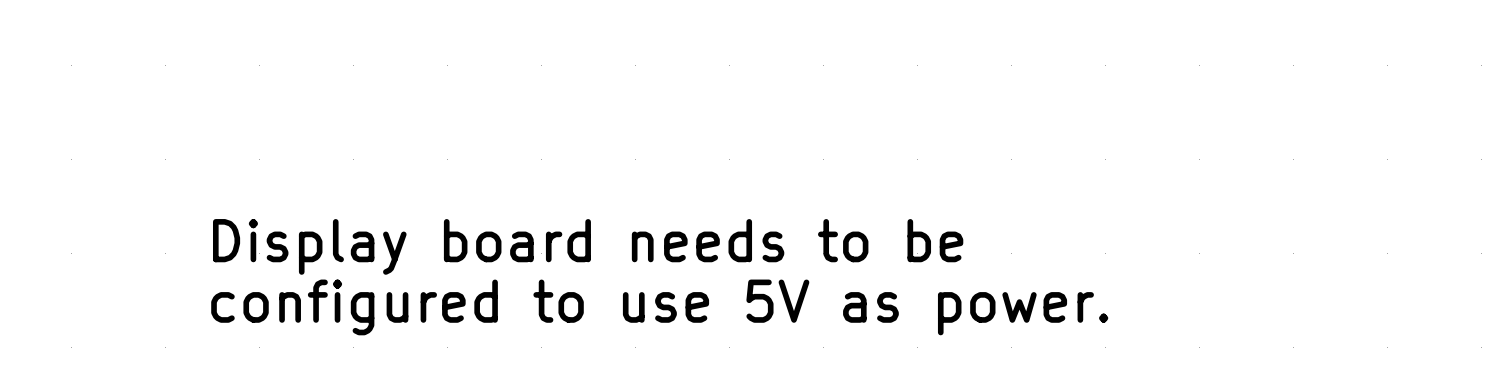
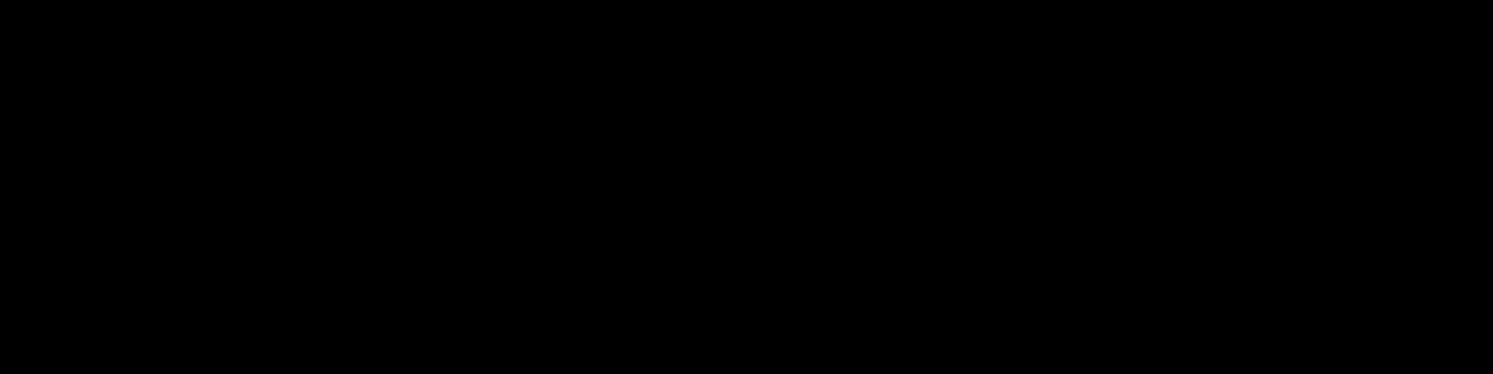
text: Display board needs to be (588, 246) -> none
text: configured to use 5V as power. (659, 307) -> none

